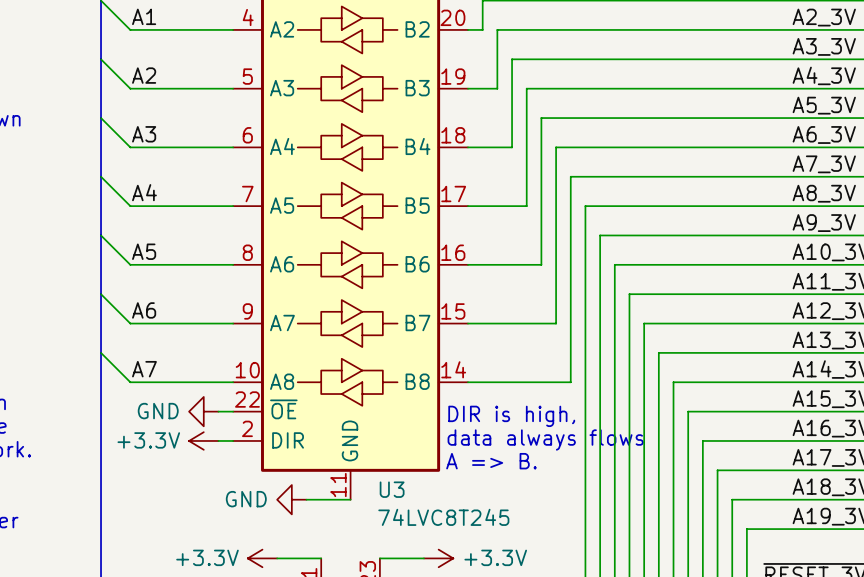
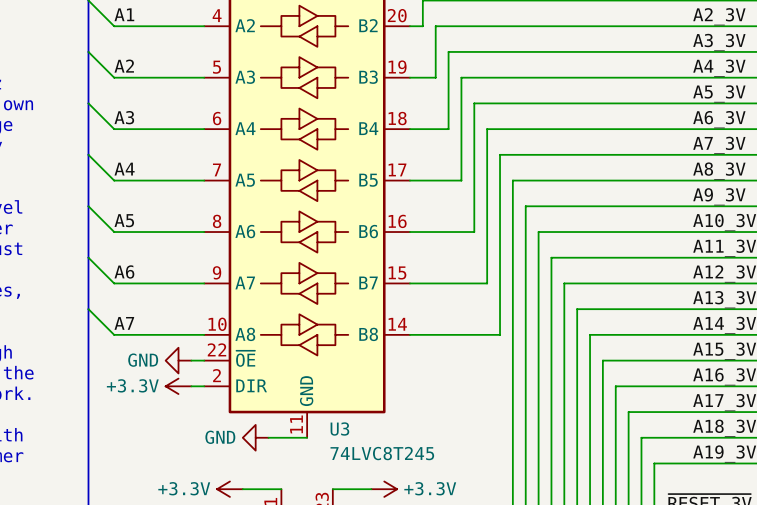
text: DIR is high, (511, 416) -> none
text: data always flows (545, 439) -> none
text: A => B. (491, 461) -> none

